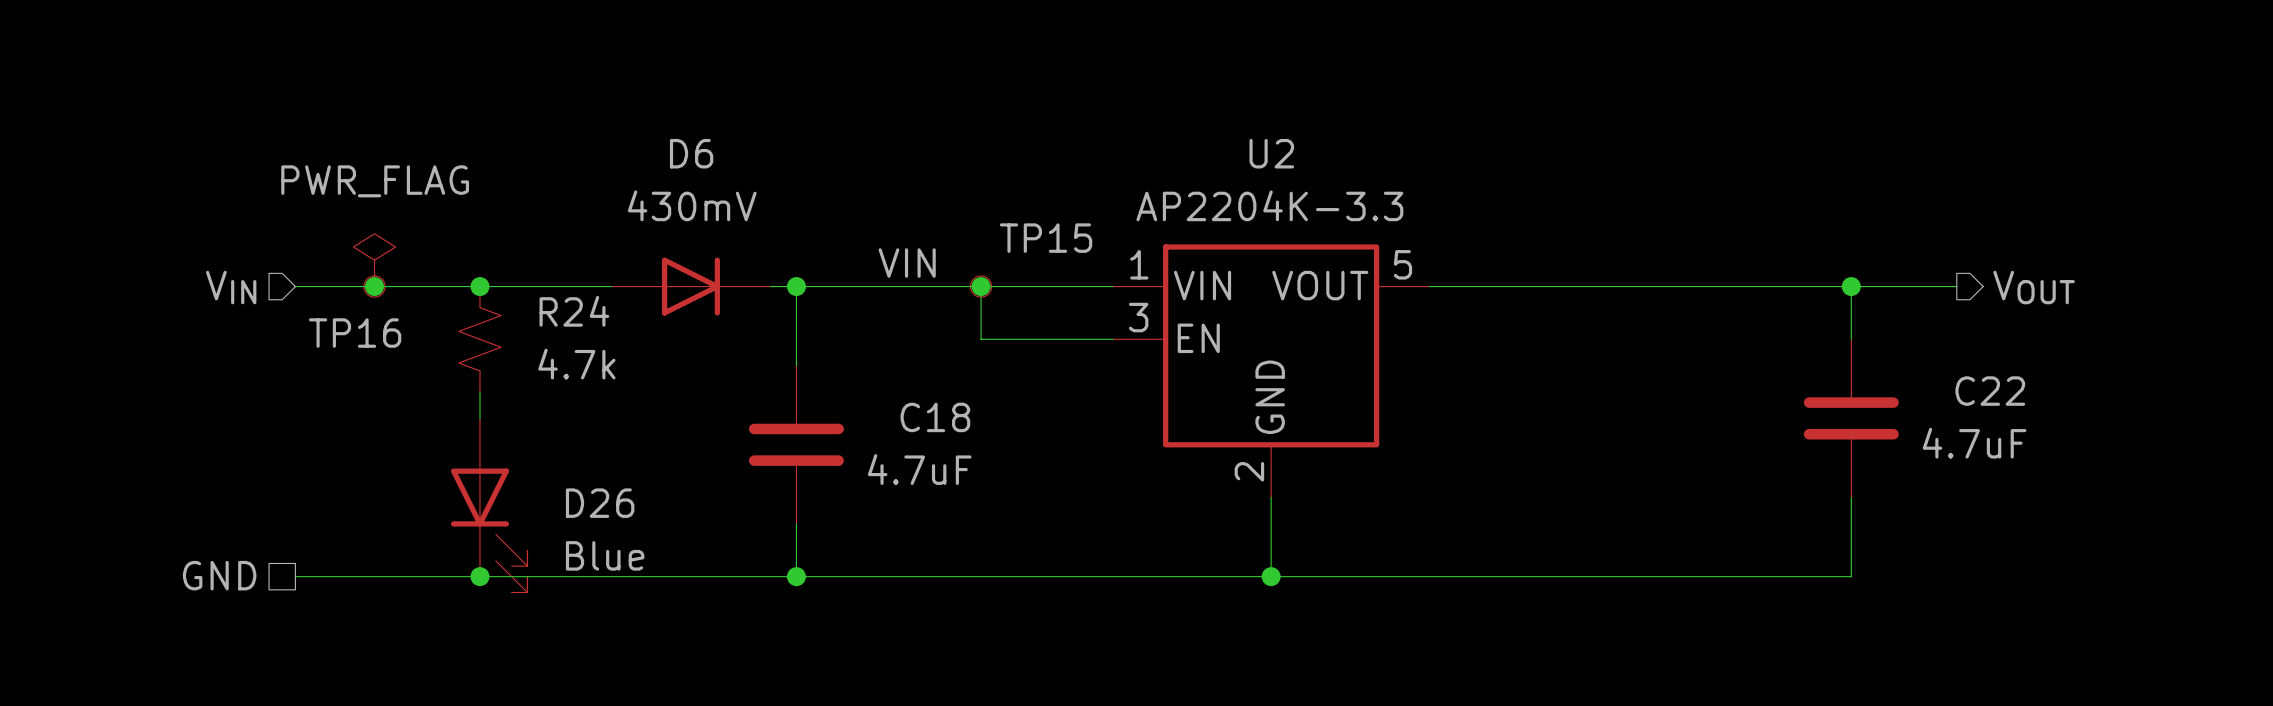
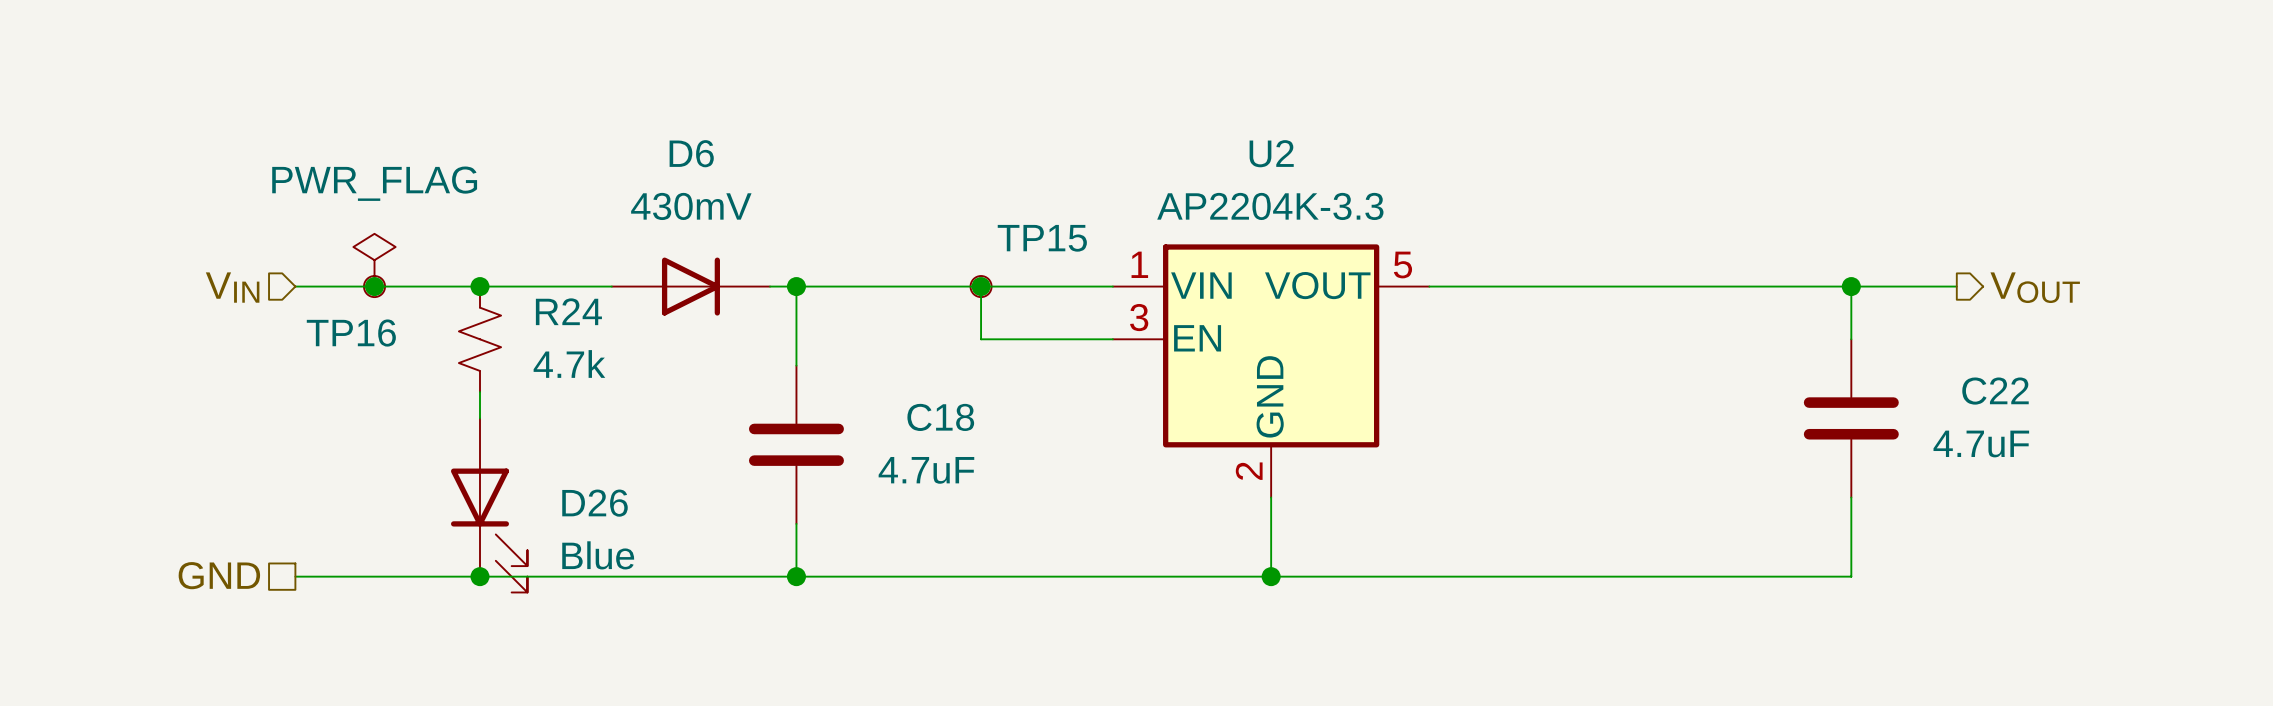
label: VIN (907, 263) -> none

